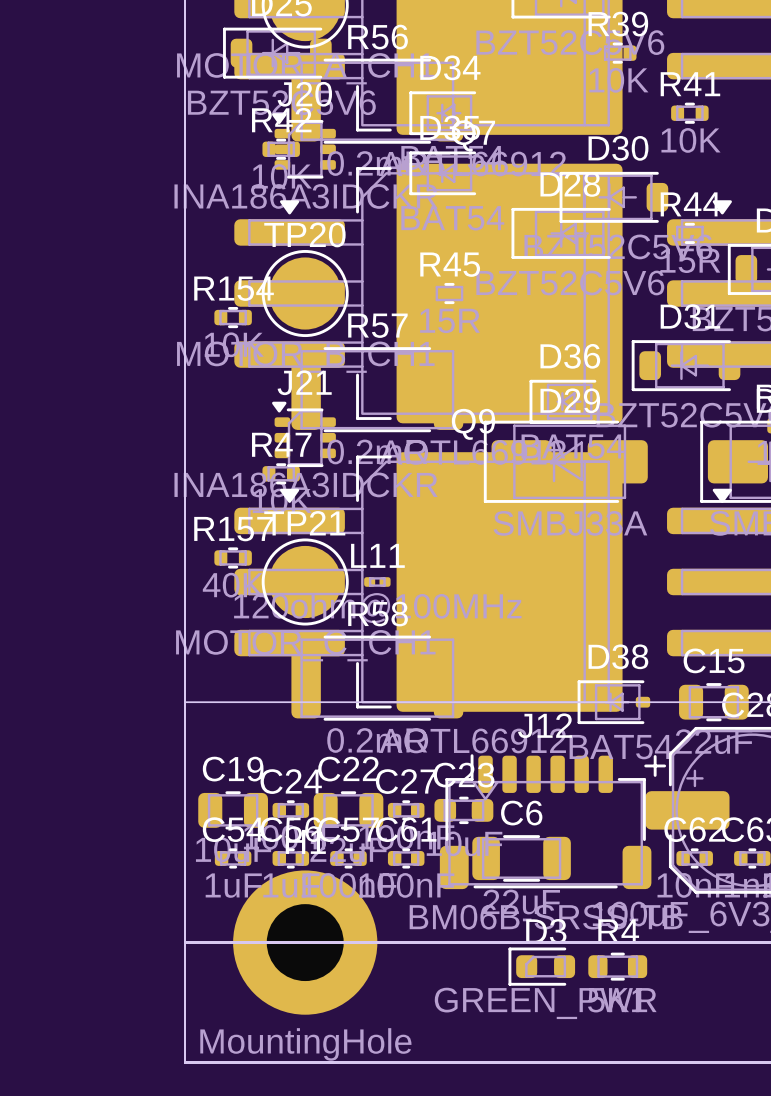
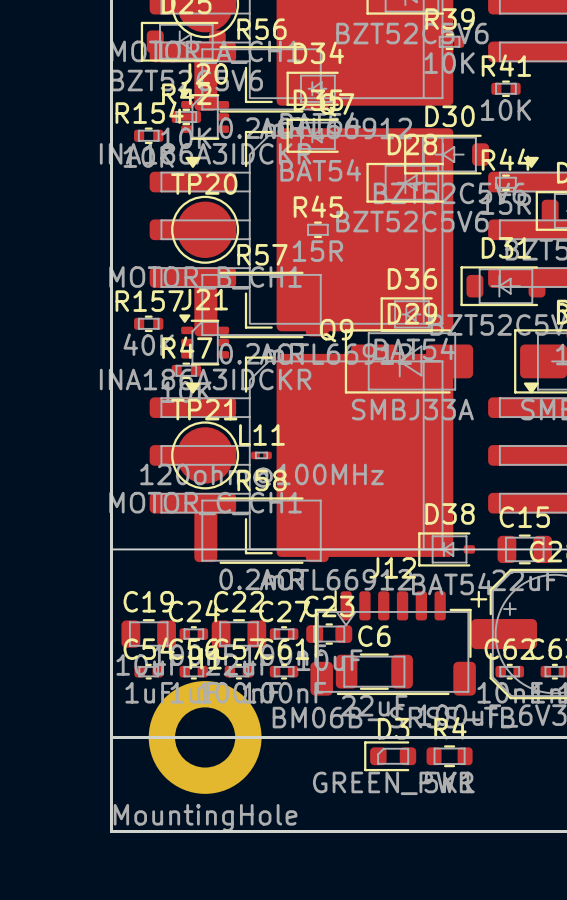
R154 position: (233, 317) -> (148, 135)
R157 position: (233, 557) -> (148, 323)

